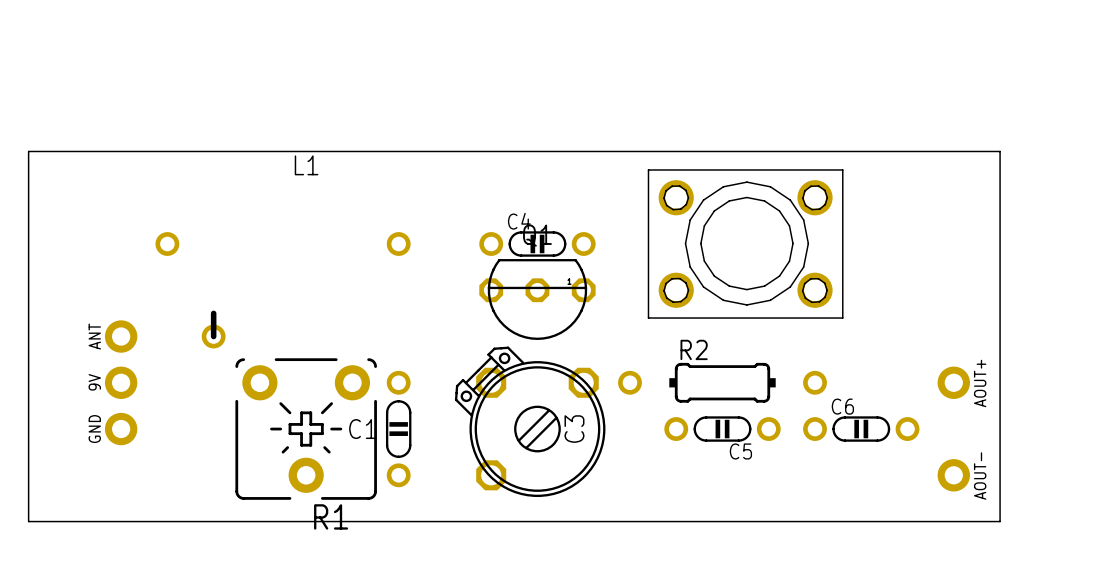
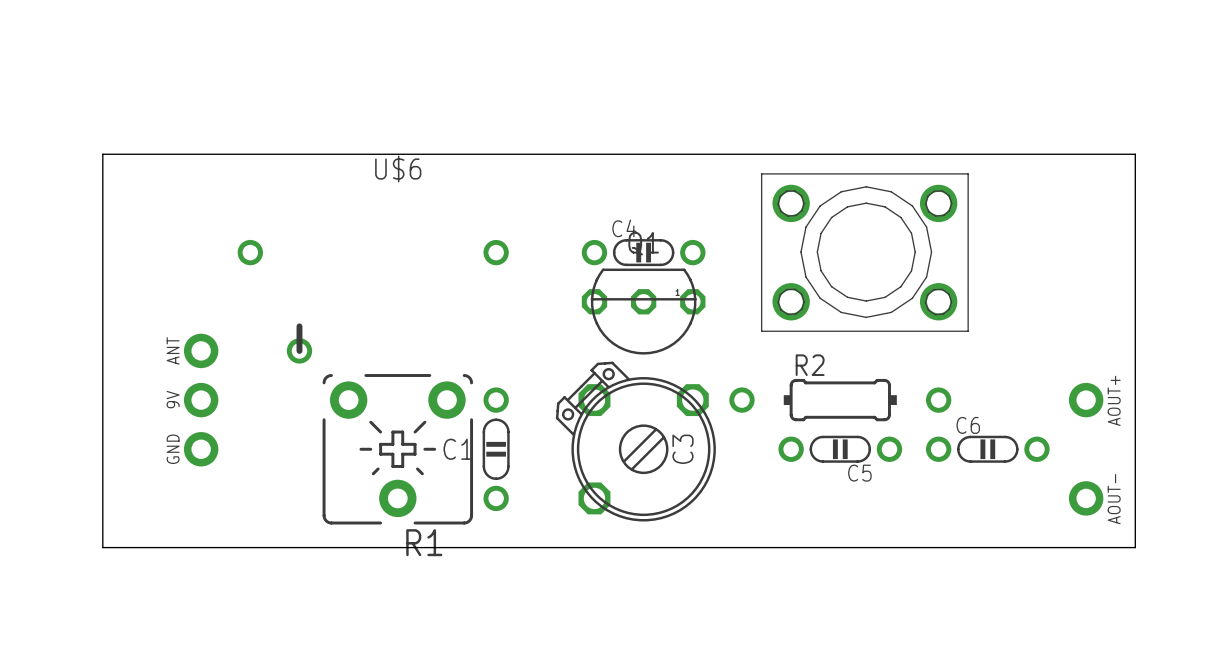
L1 name: L1 (306, 165) -> U$6 (398, 169)

